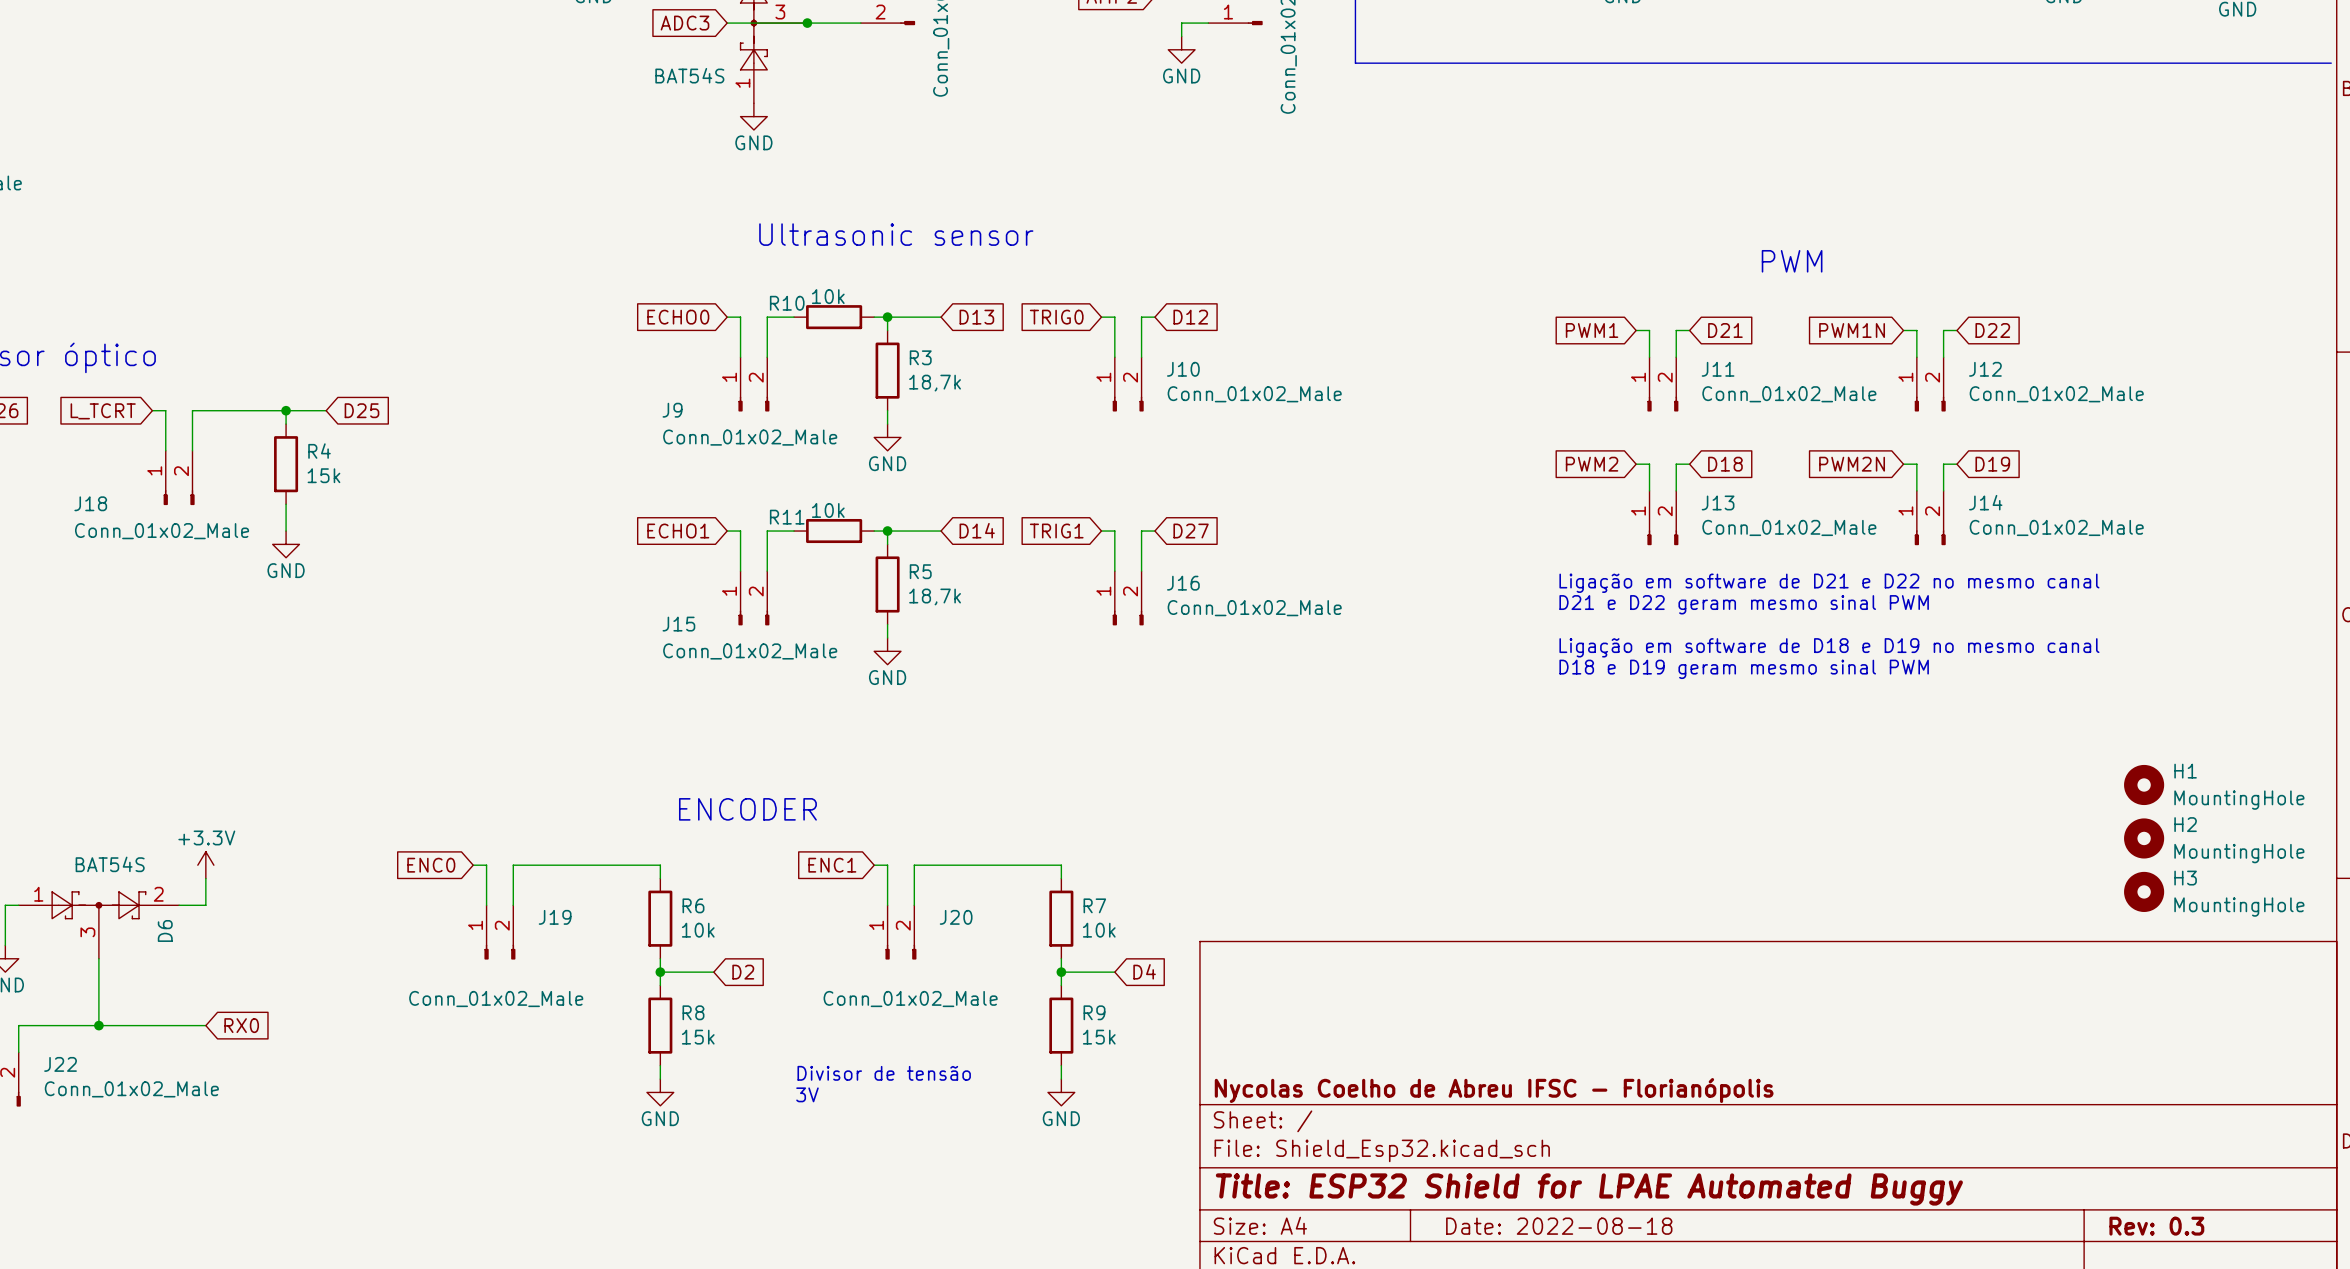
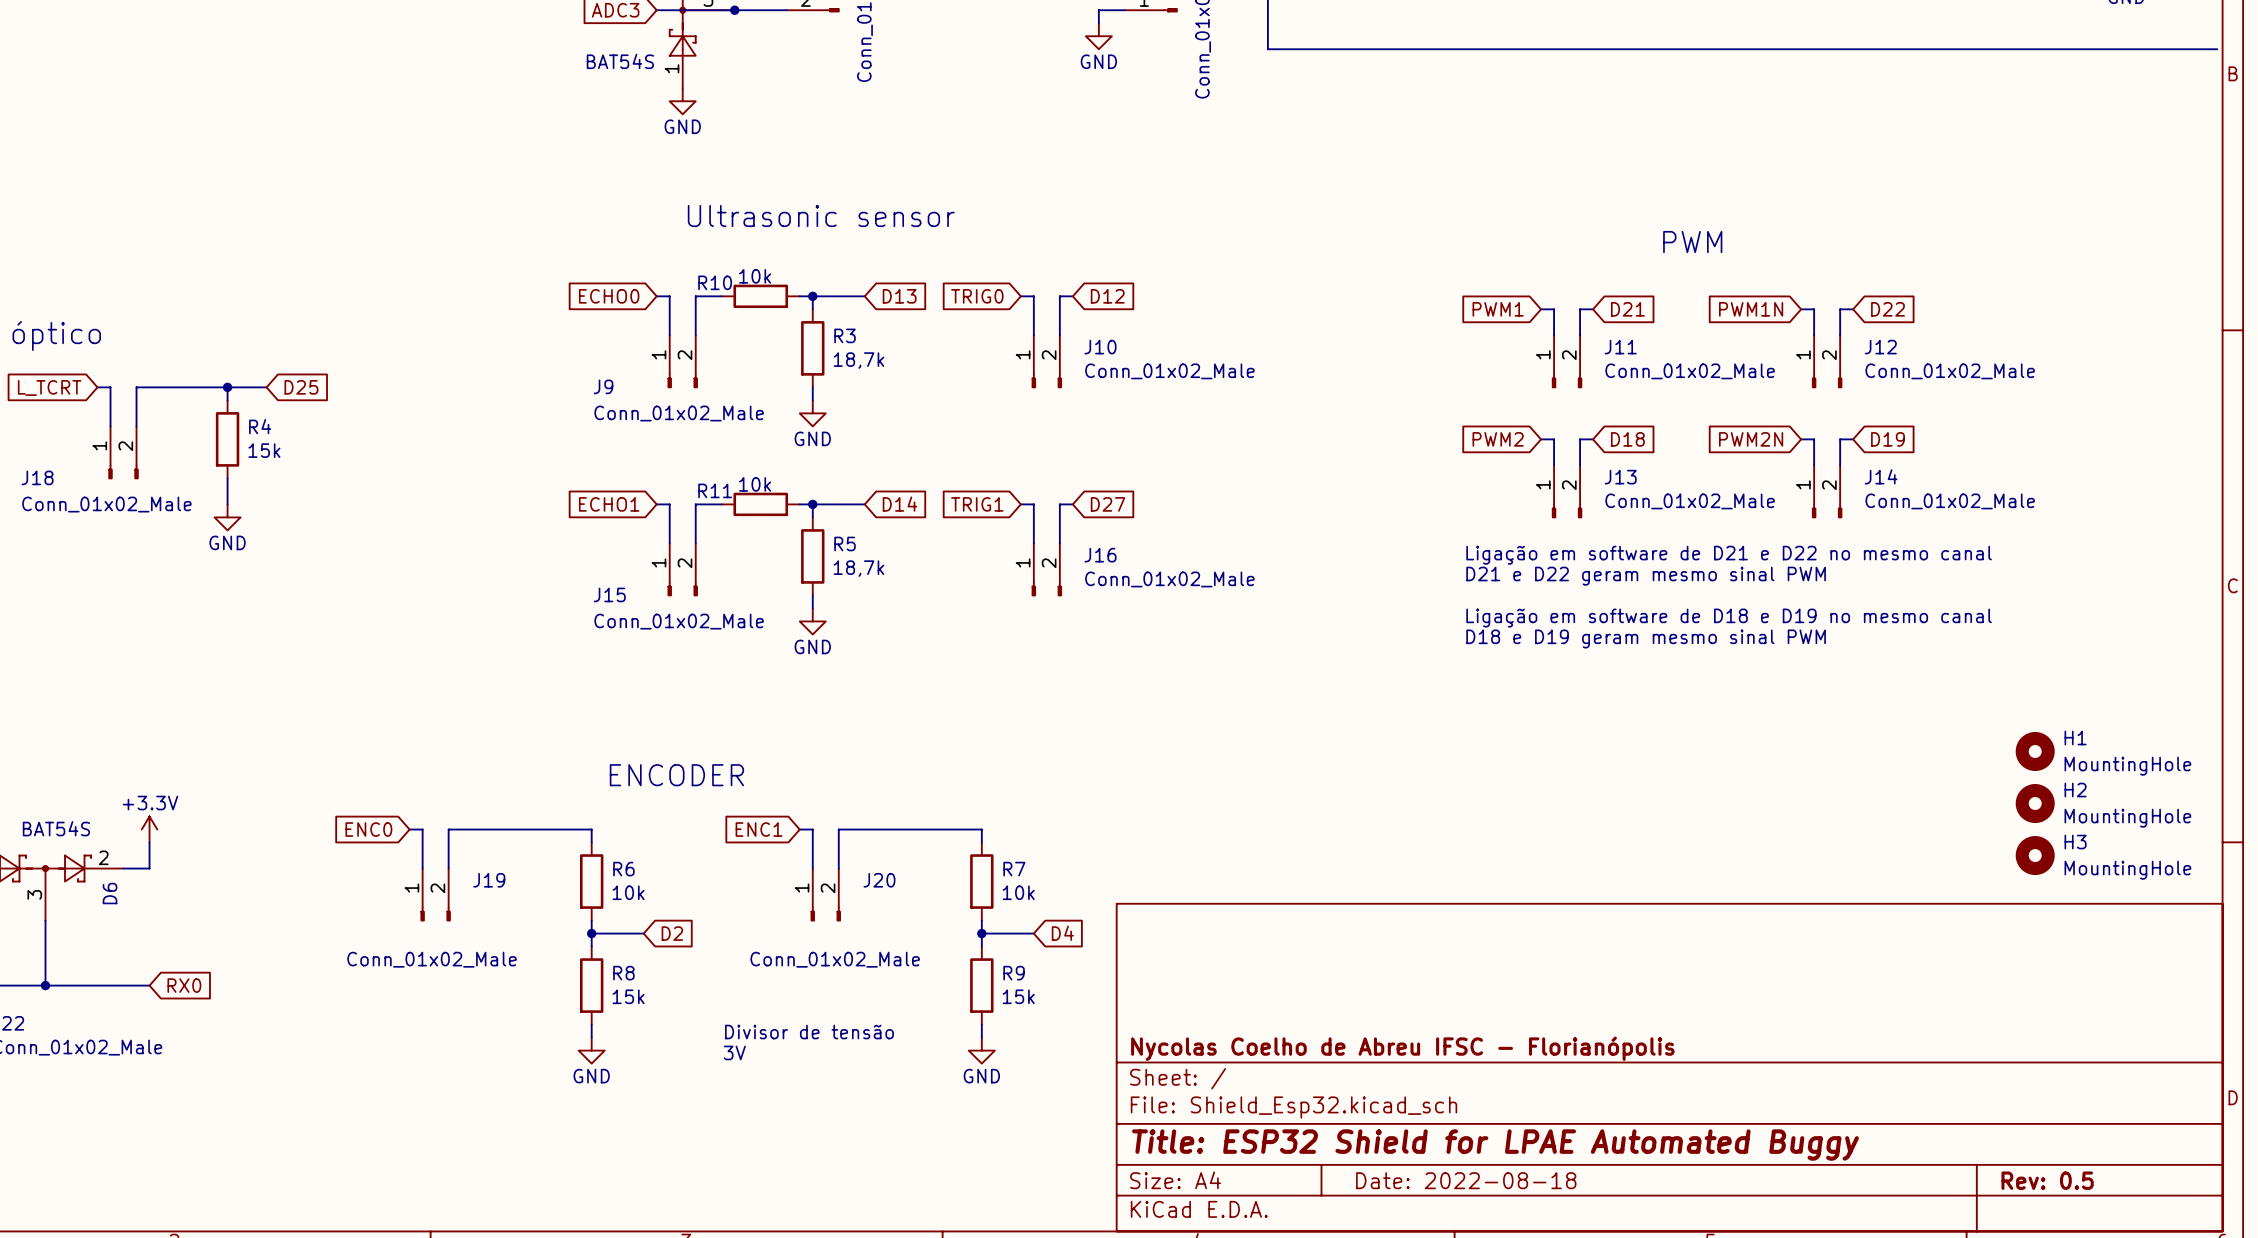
title block: Rev: 0.3 (2156, 1226) -> Rev: 0.5 (2047, 1180)

